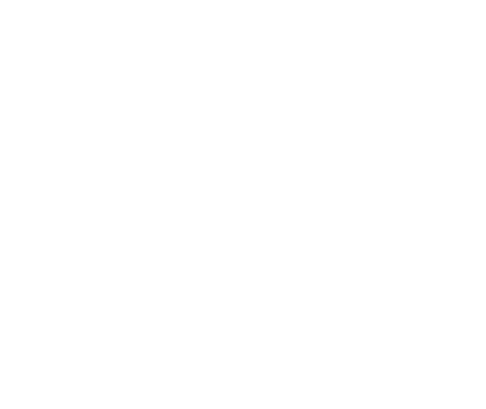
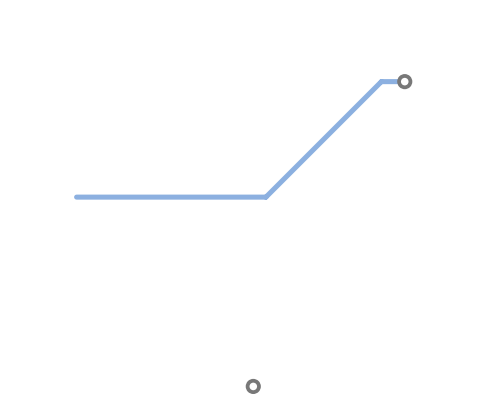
track: none -> (404, 81) (381, 81) (265, 197) (76, 197)
via: none -> (404, 81)
via: none -> (253, 386)

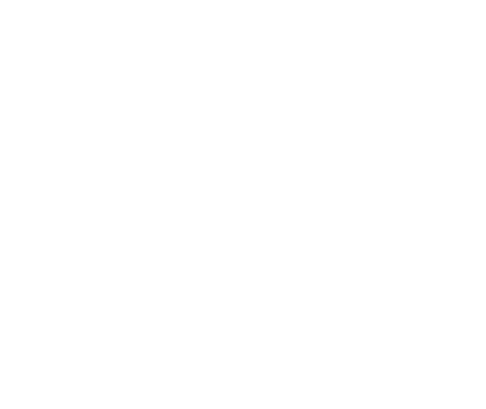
track: (404, 81) (381, 81) (265, 197) (76, 197) -> none
via: (404, 81) -> none
via: (253, 386) -> none

